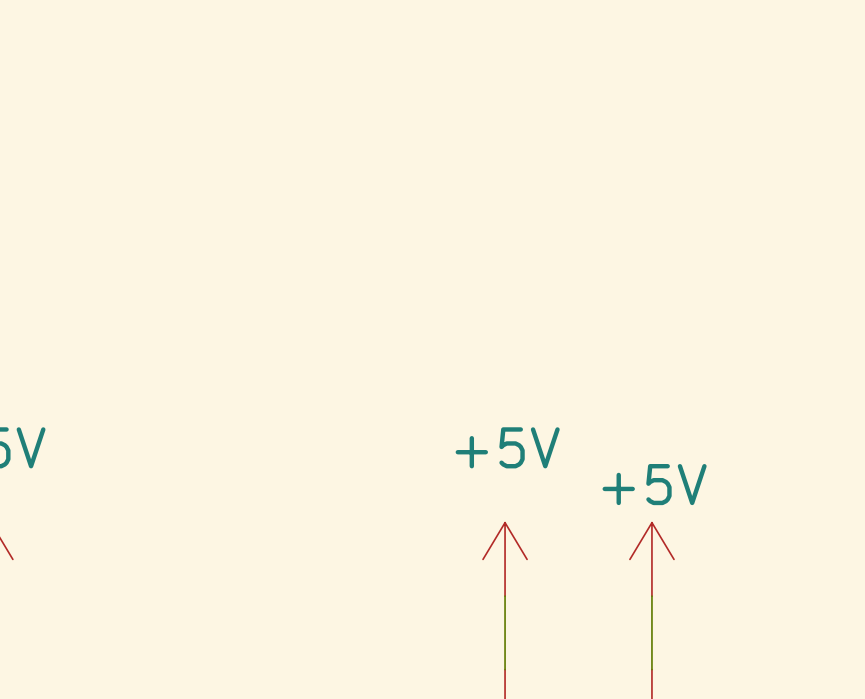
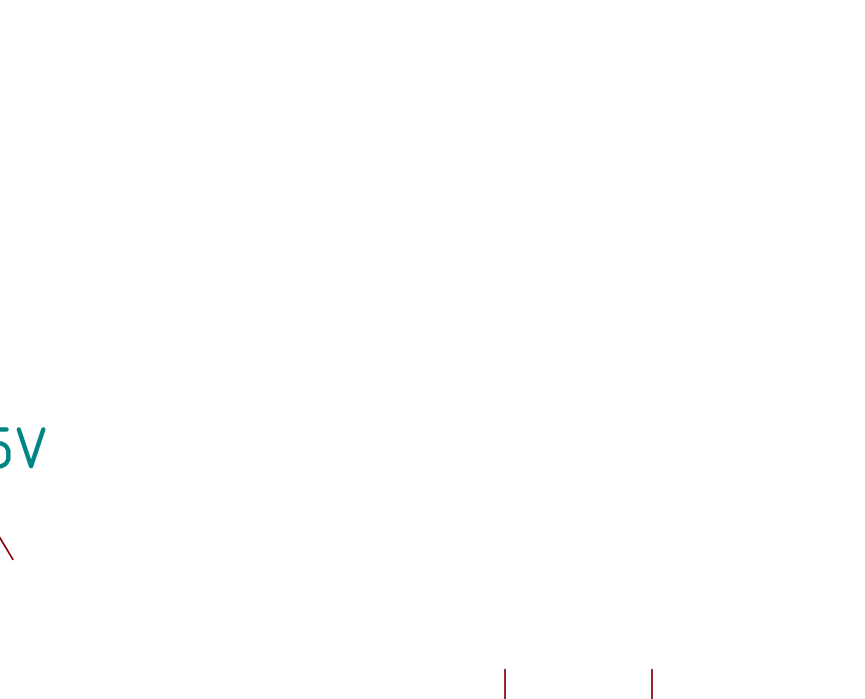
power symbol: +5V (505, 559) -> none
power symbol: +5V (651, 559) -> none
wire: (505, 596) (505, 669) -> none
wire: (651, 596) (651, 669) -> none

